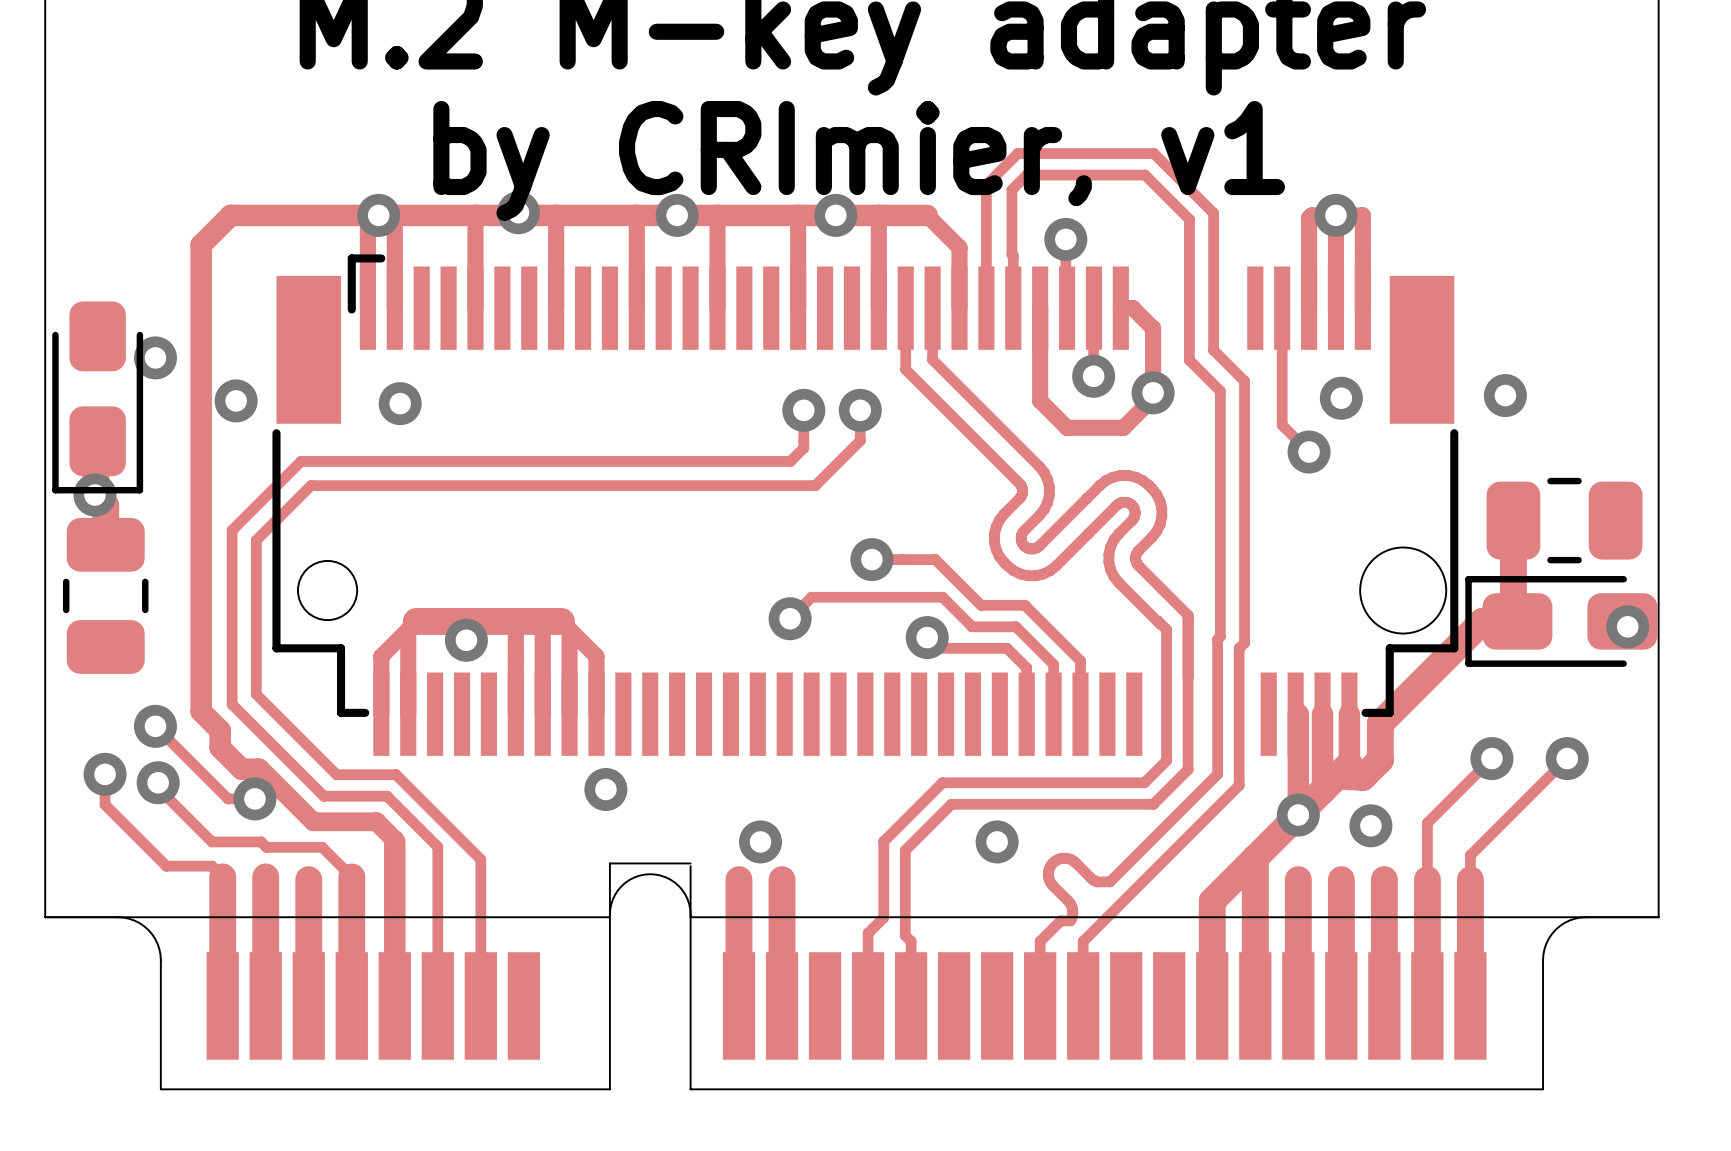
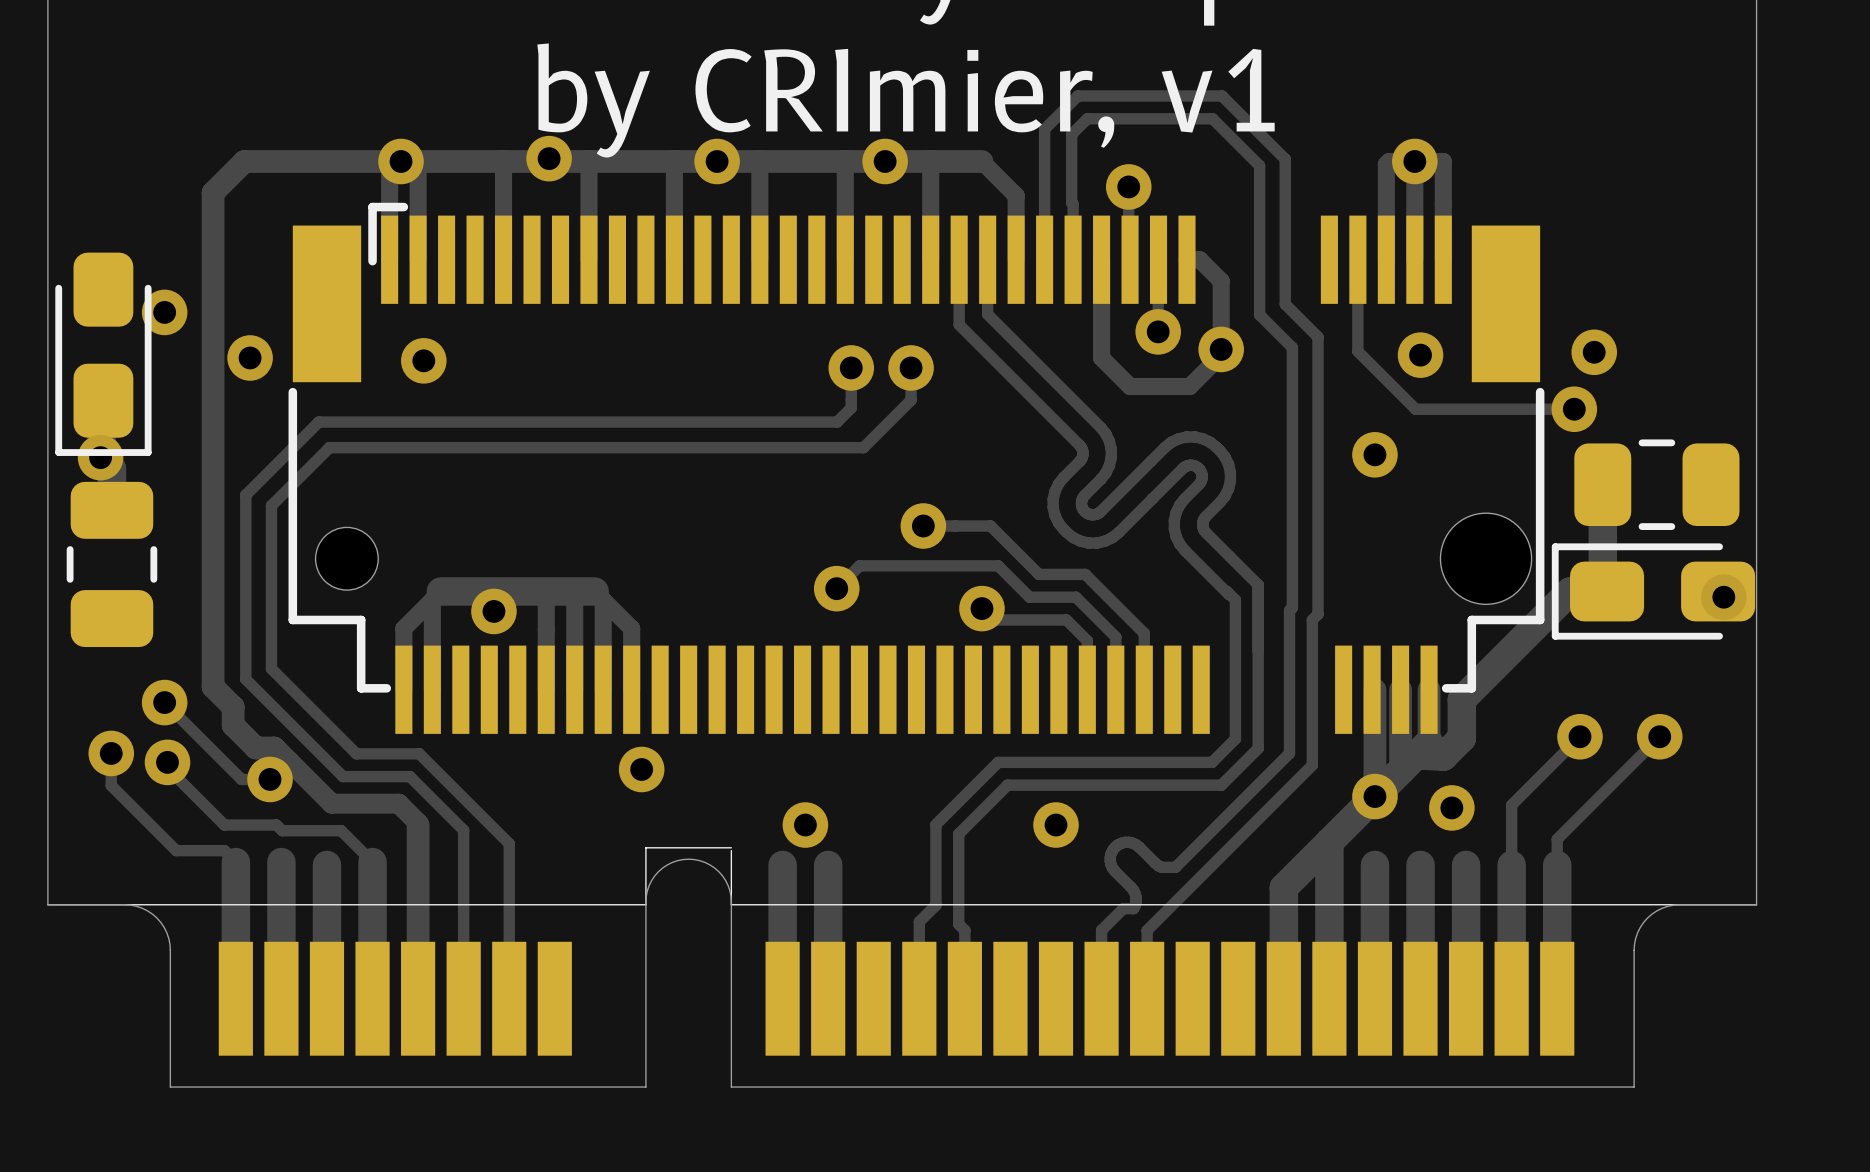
track: (1282, 394) (1282, 425) (1309, 452) -> (1357, 351) (1415, 409) (1574, 409)
via: none -> (1574, 409)
via position: (1309, 452) -> (1374, 454)

